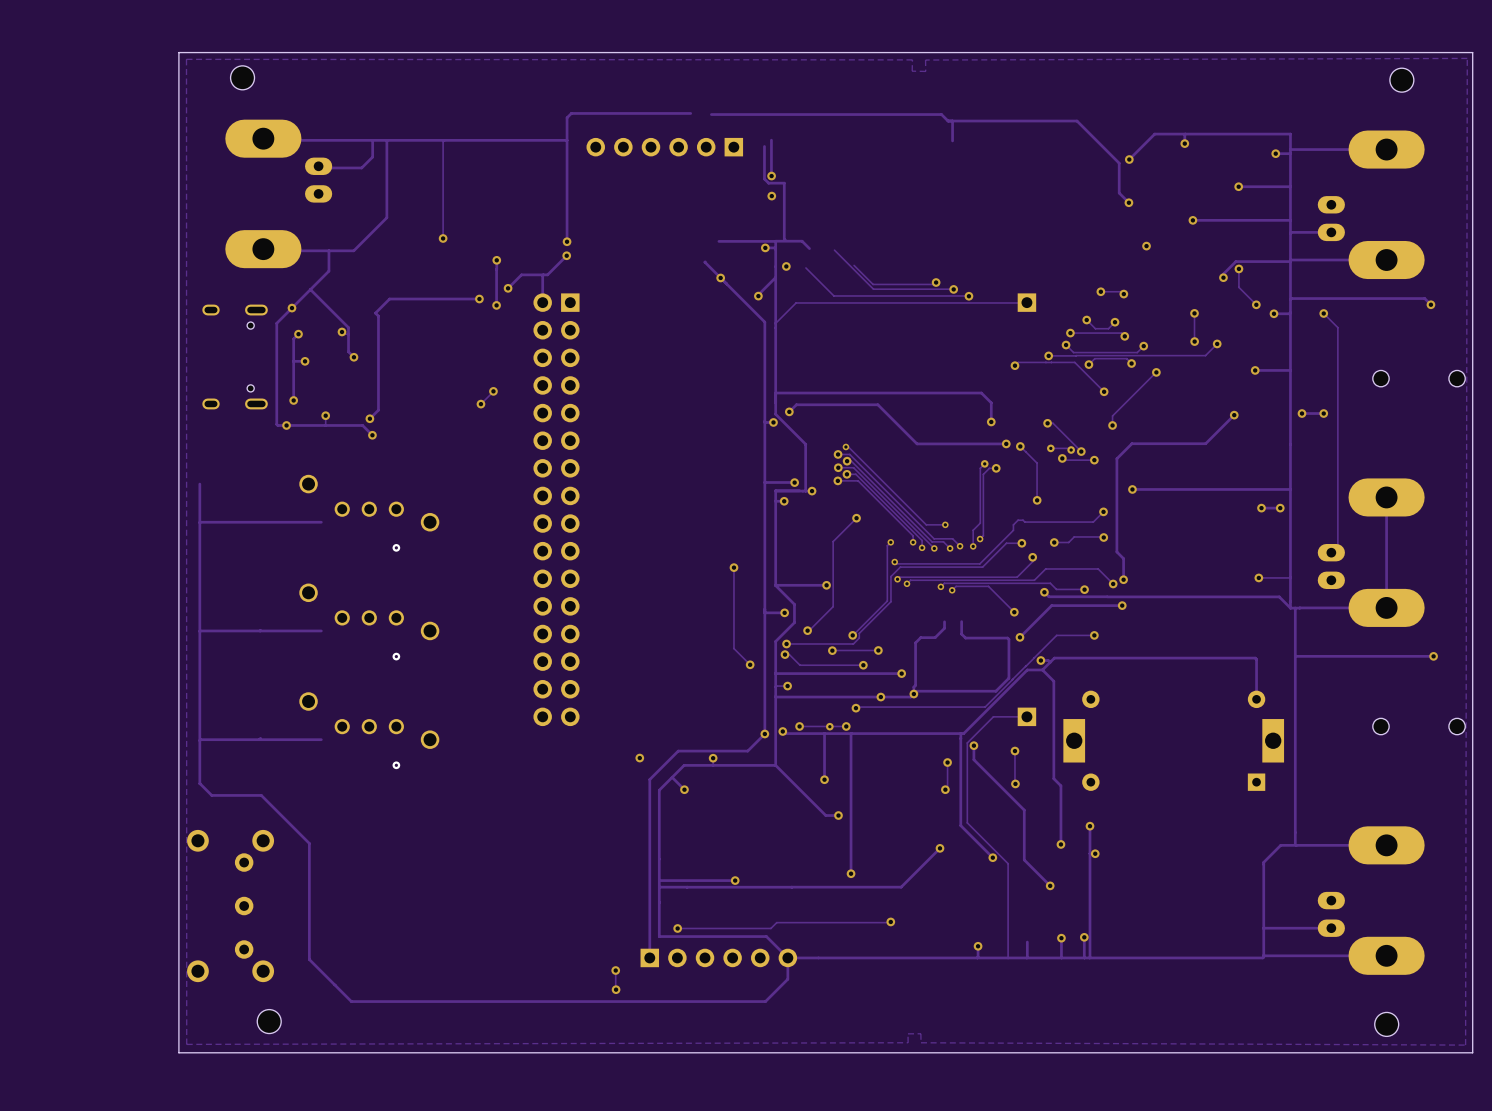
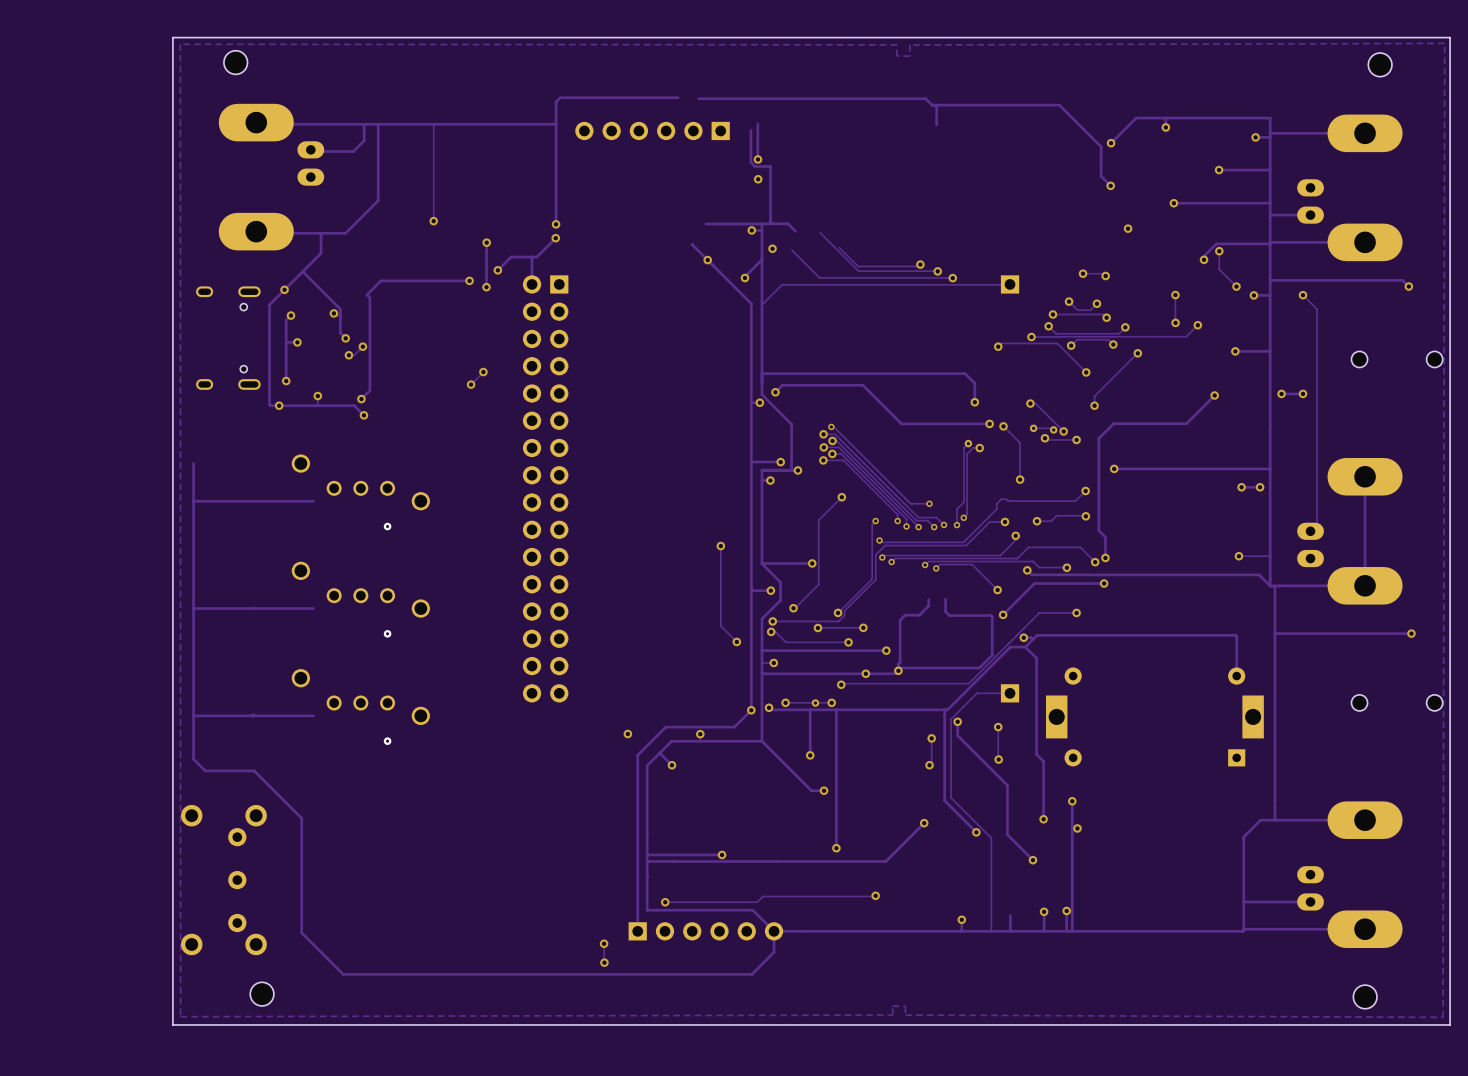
track: none -> (362, 346) (354, 355) (348, 355)
via: none -> (362, 346)
via: none -> (348, 355)

